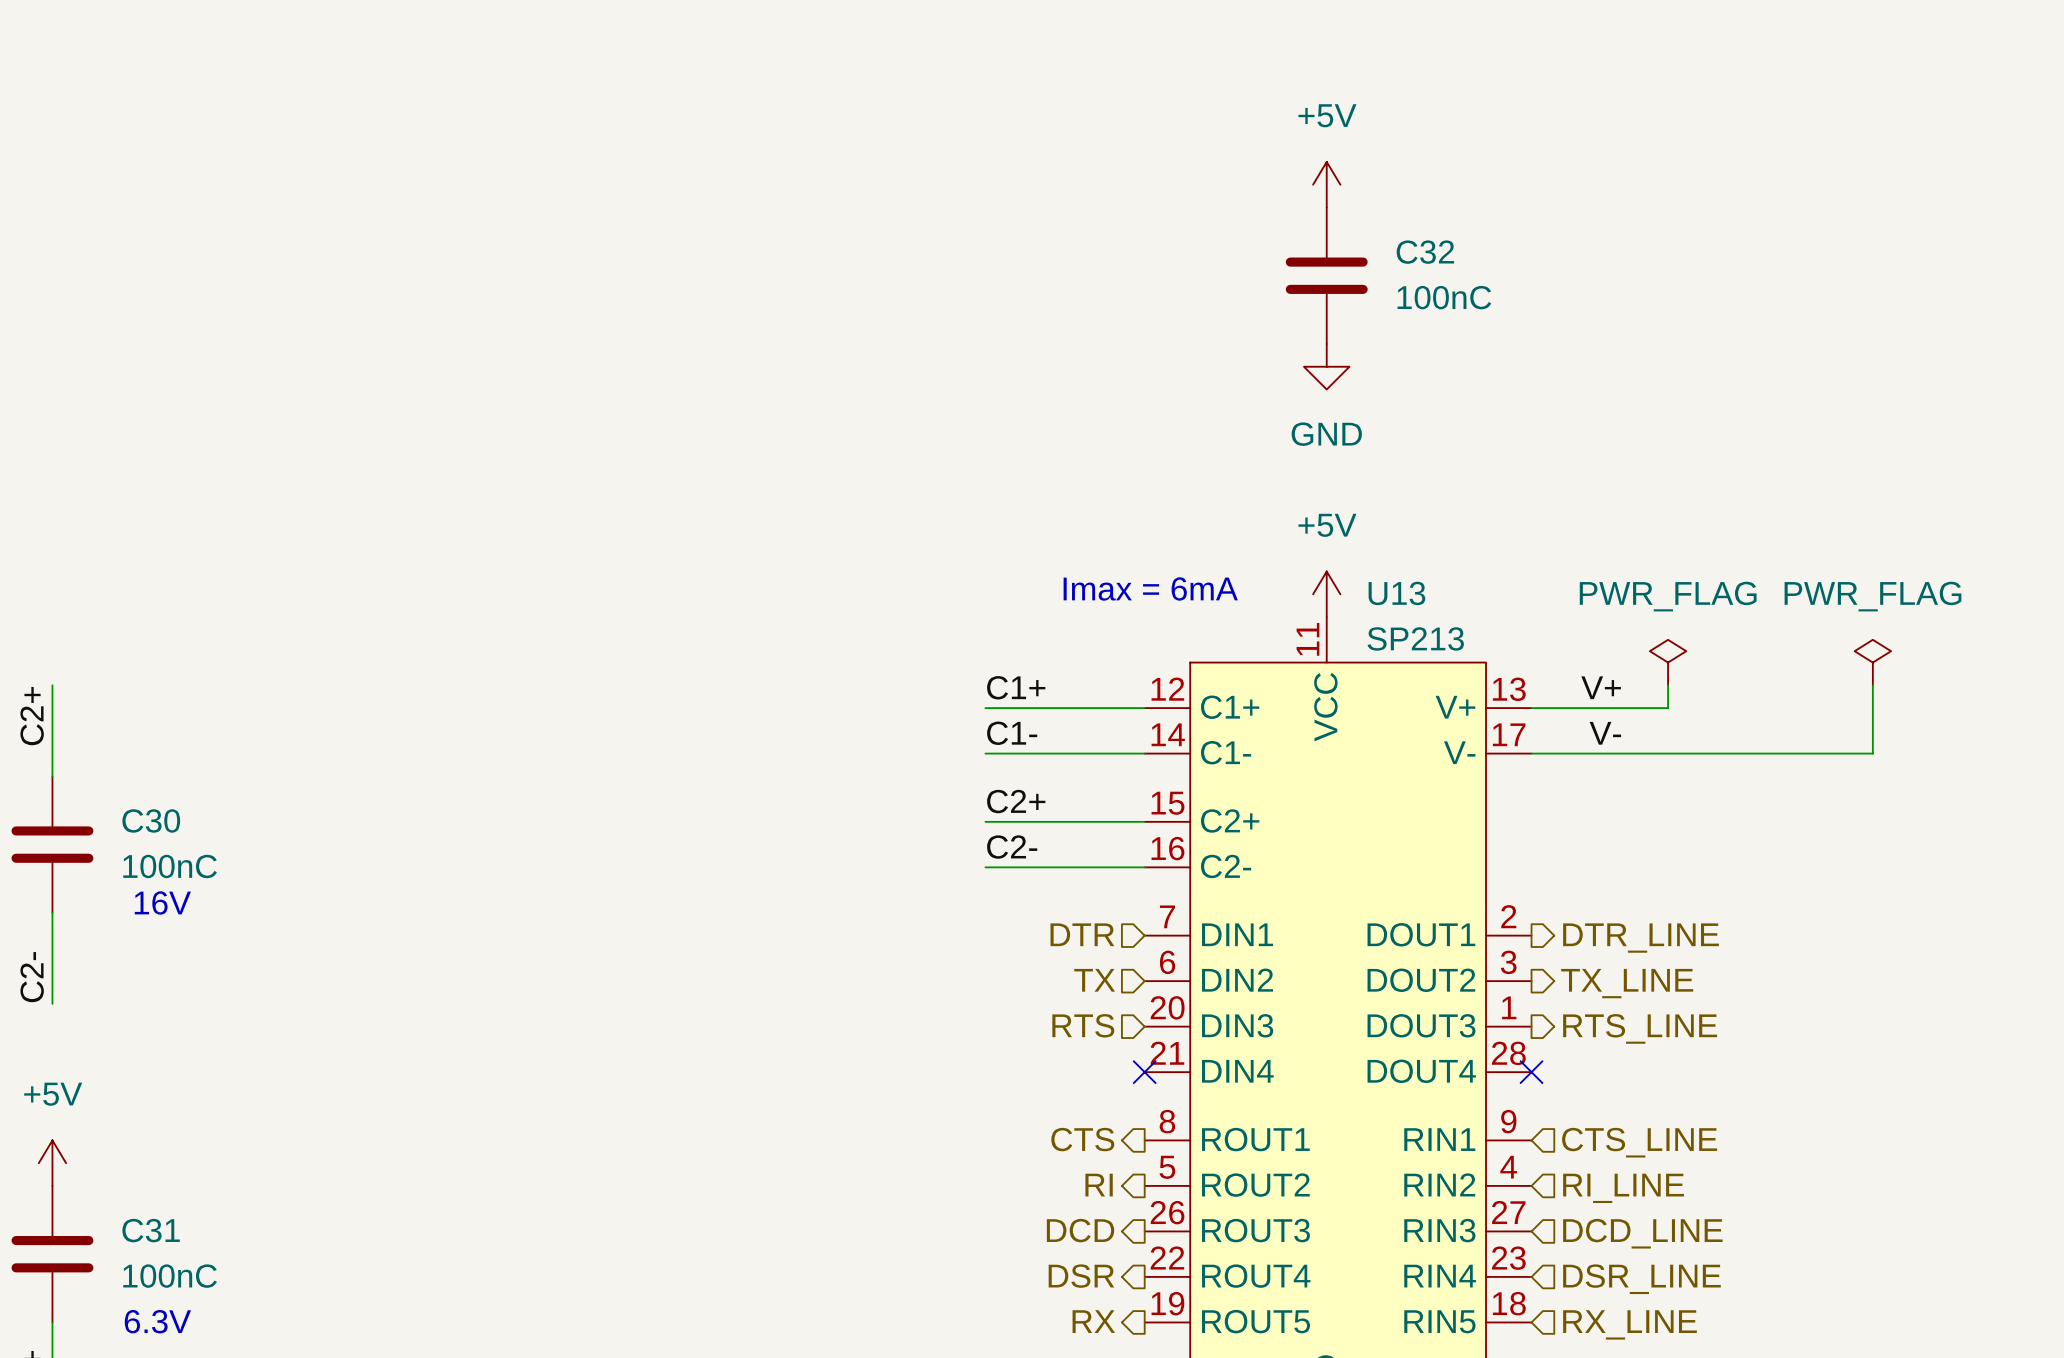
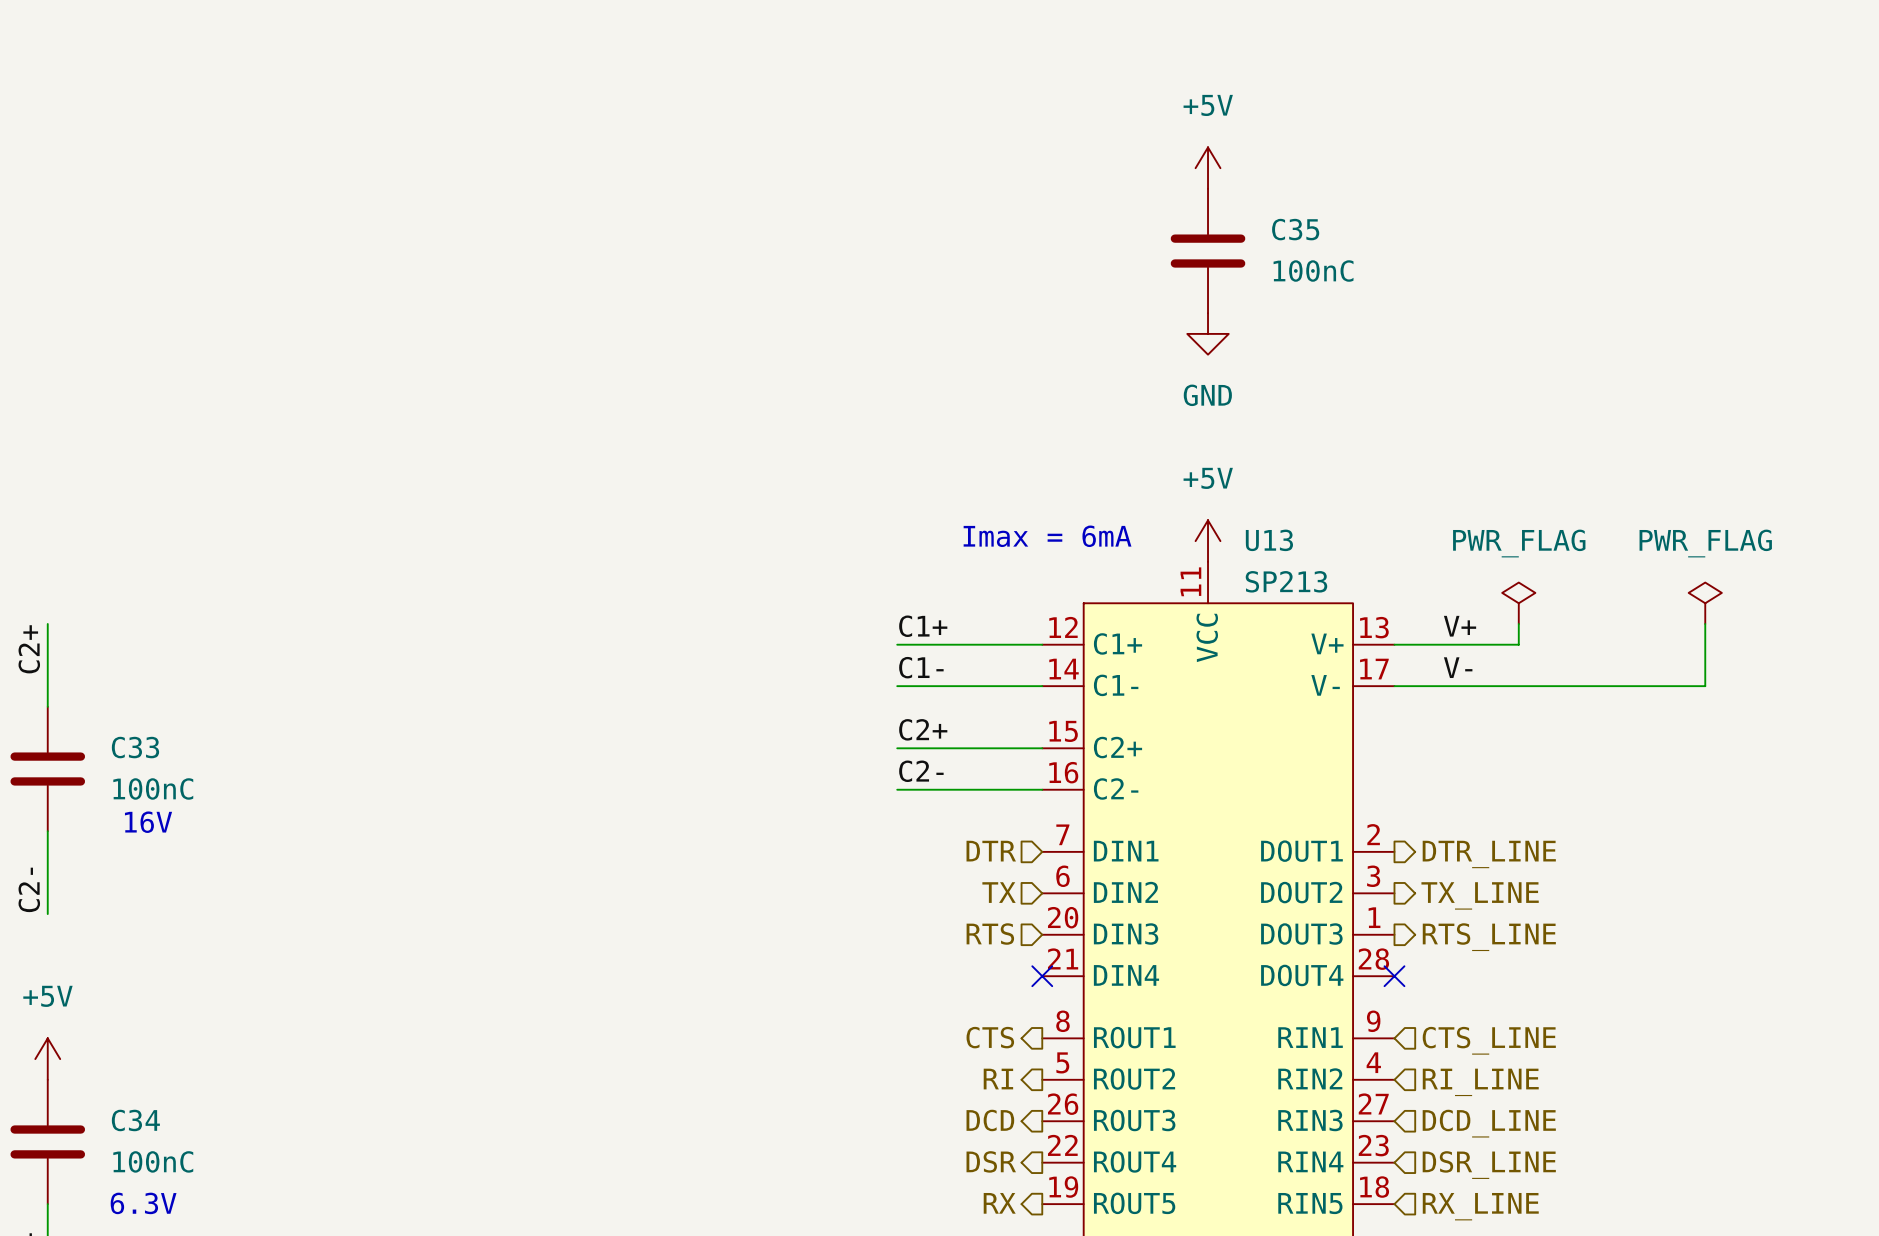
C32 name: C32 (1425, 252) -> C35 (1295, 229)
C30 name: C30 (151, 820) -> C33 (135, 747)
C31 name: C31 (151, 1230) -> C34 (135, 1120)

